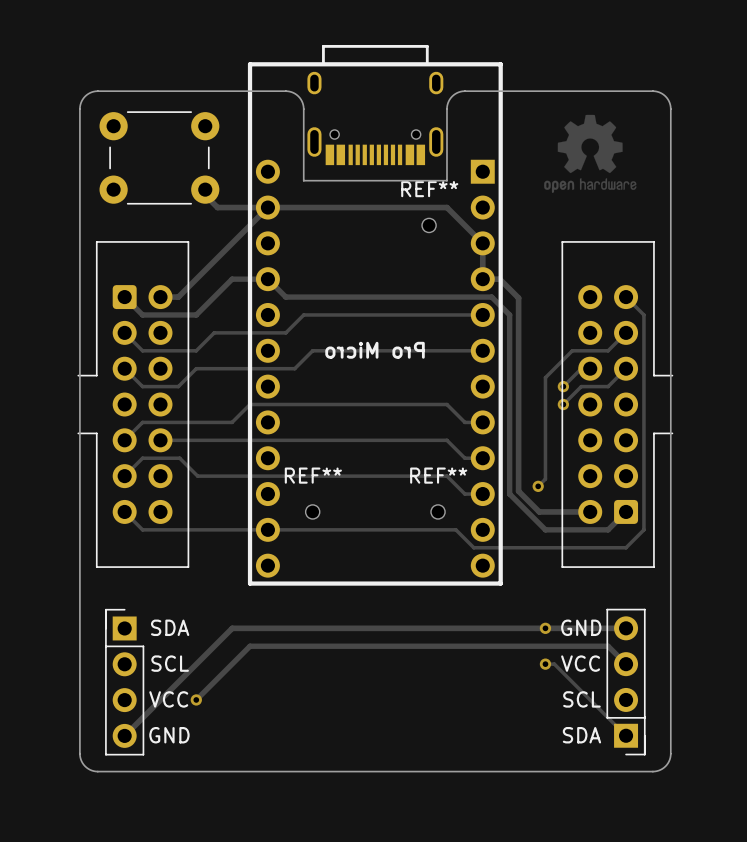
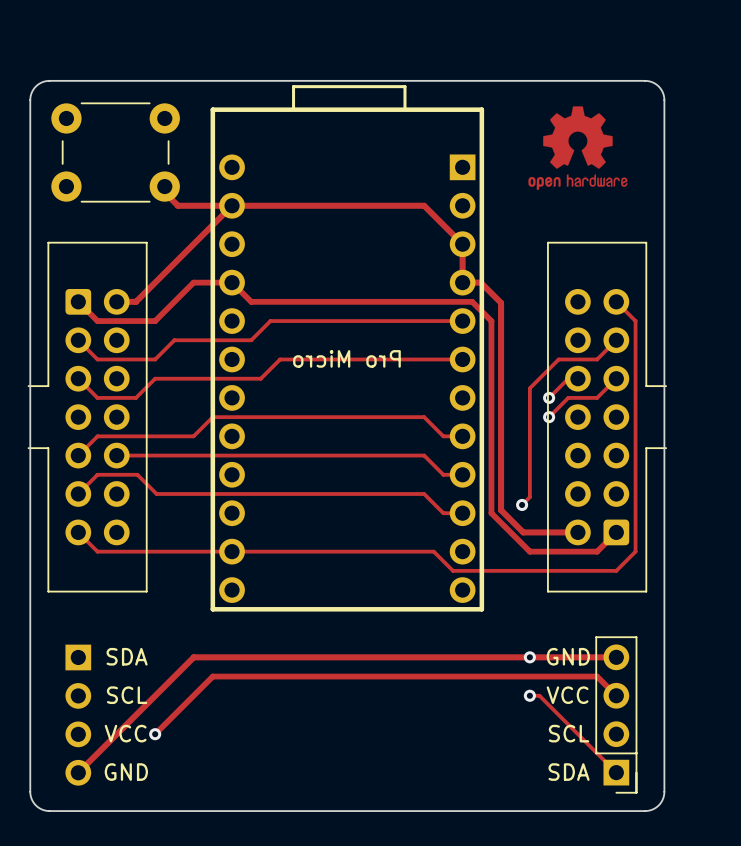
board edge: (285, 91) (297, 95) (303, 105) (303, 180) (446, 180) (447, 105) (453, 95) (464, 91) -> (251, 80) (443, 80)
part: (375, 118) -> none
REF**: (429, 225) -> none
part: (375, 315) -> none
part: none -> (347, 348)
REF**: (312, 511) -> none
REF**: (438, 511) -> none
part side: top (124, 682) -> bottom (78, 715)

